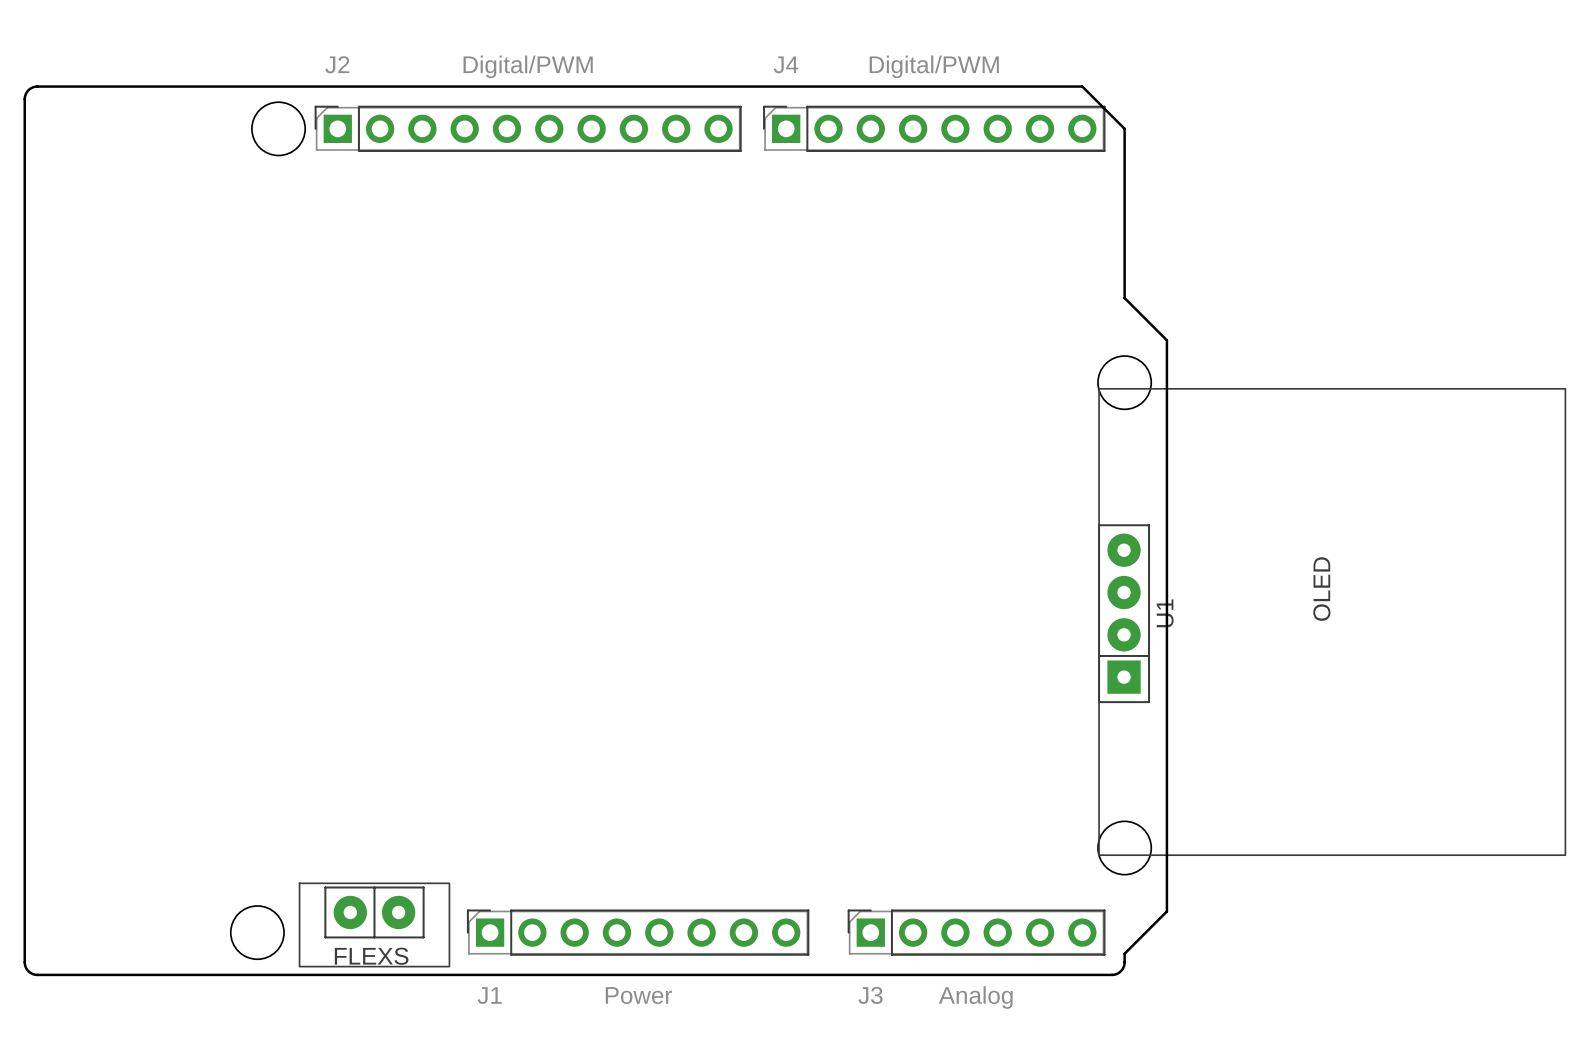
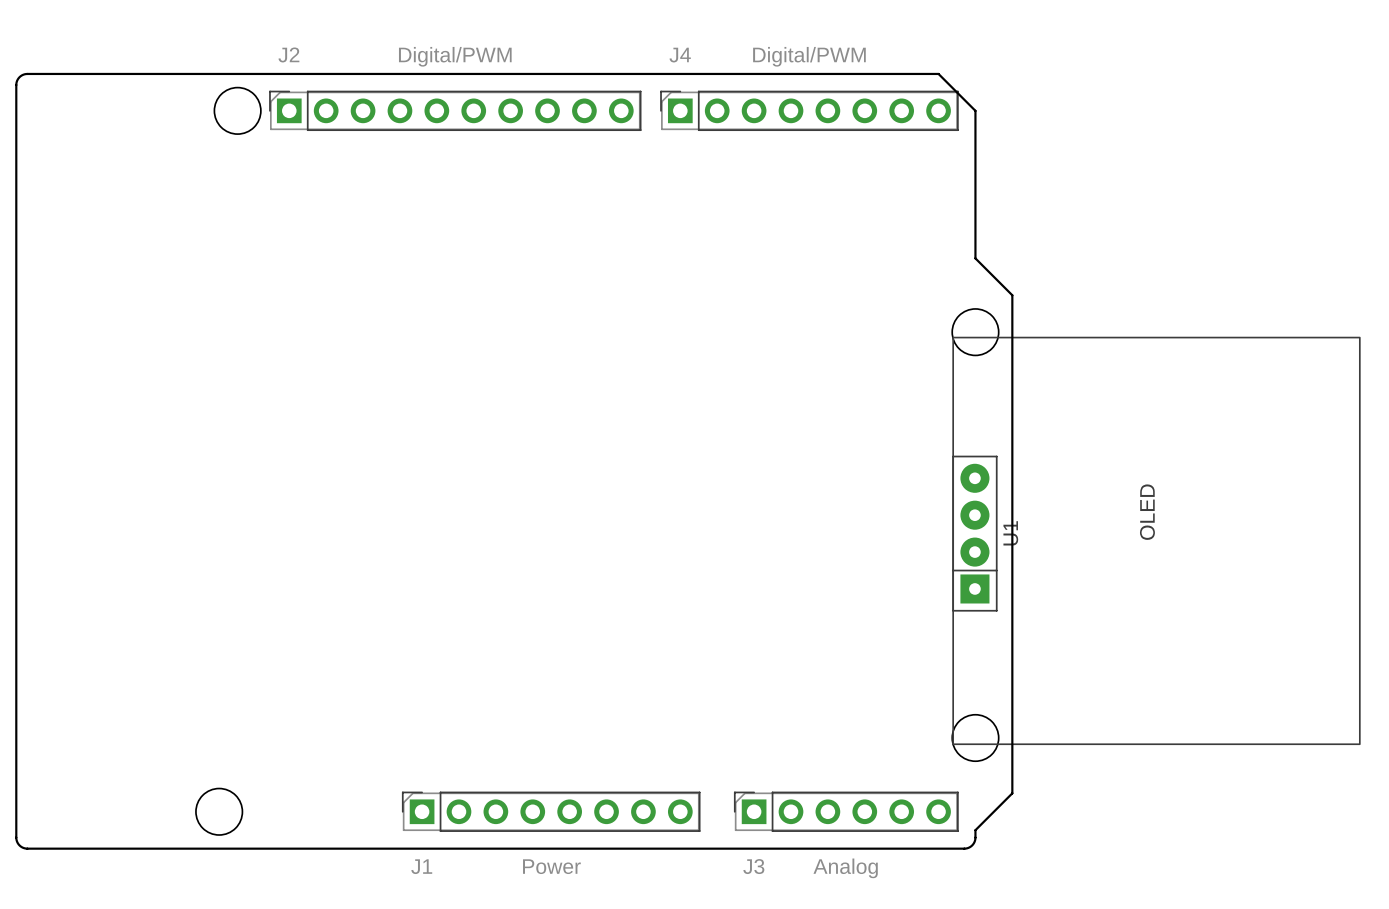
part: (374, 924) -> none

